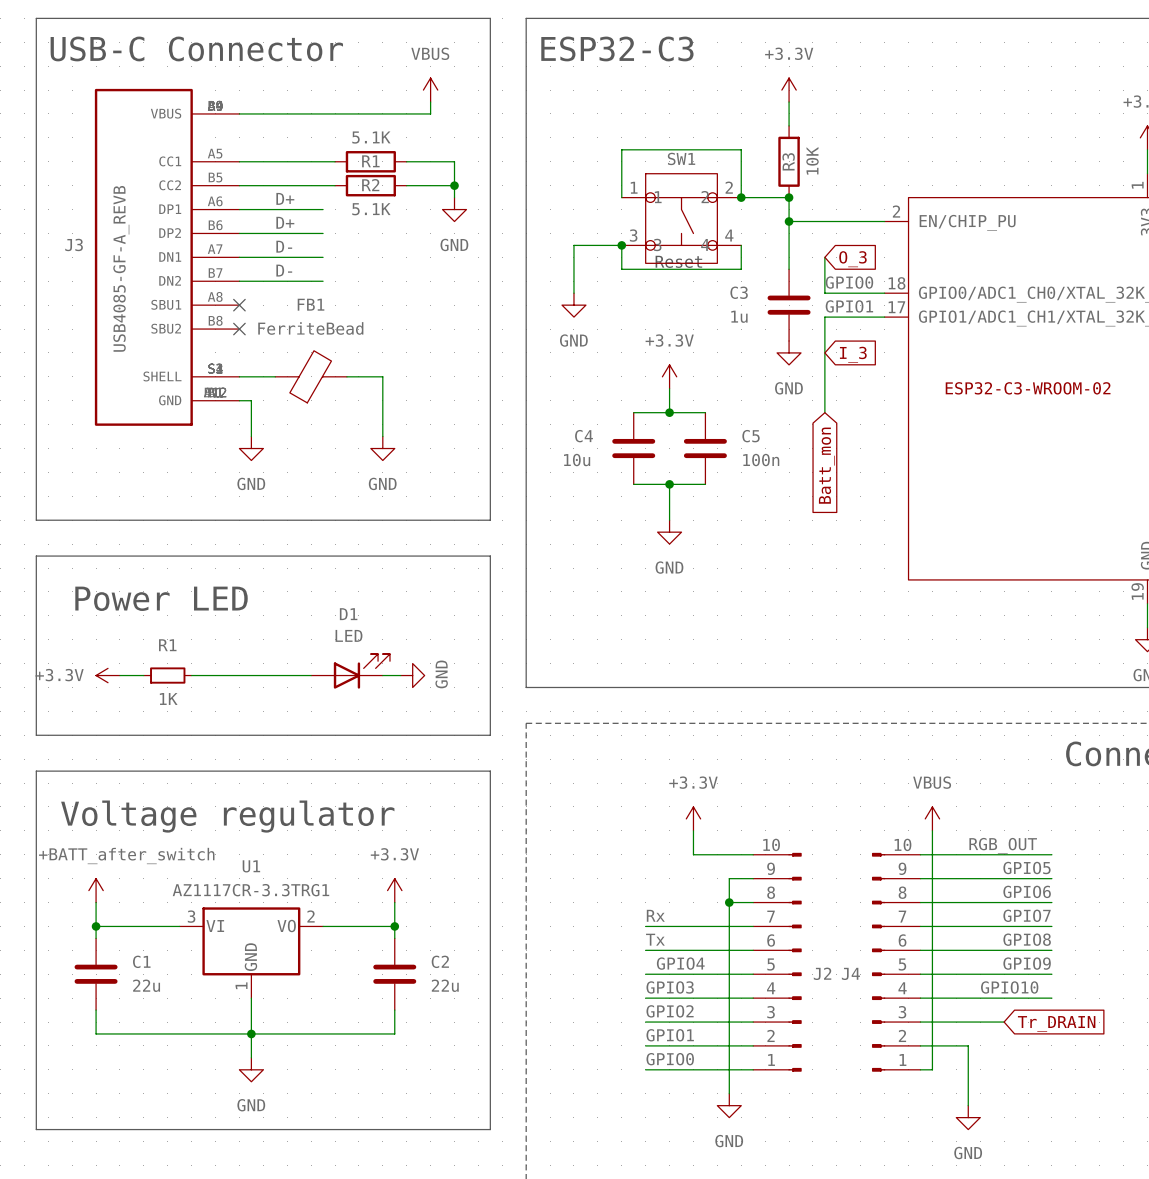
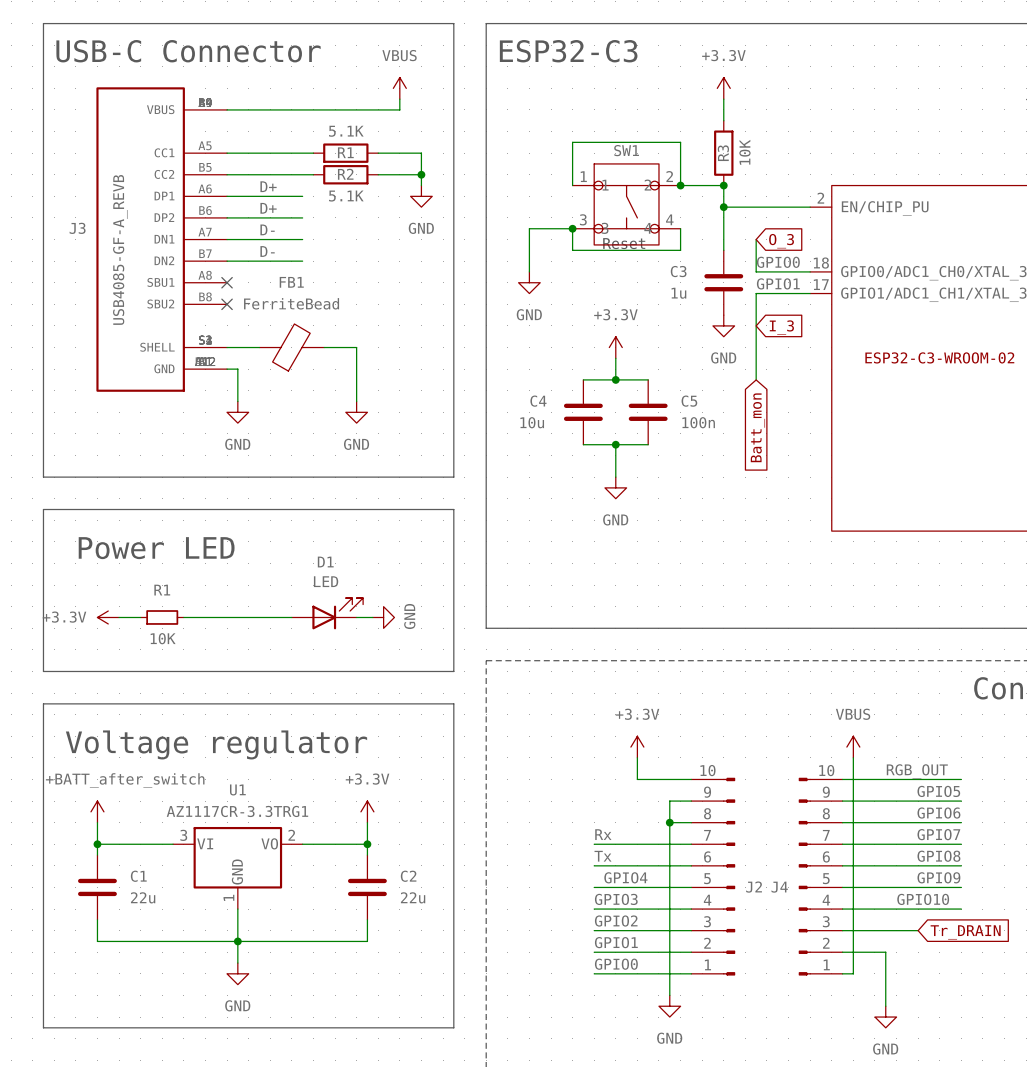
R1 value: 1K (168, 698) -> 10K (163, 638)

